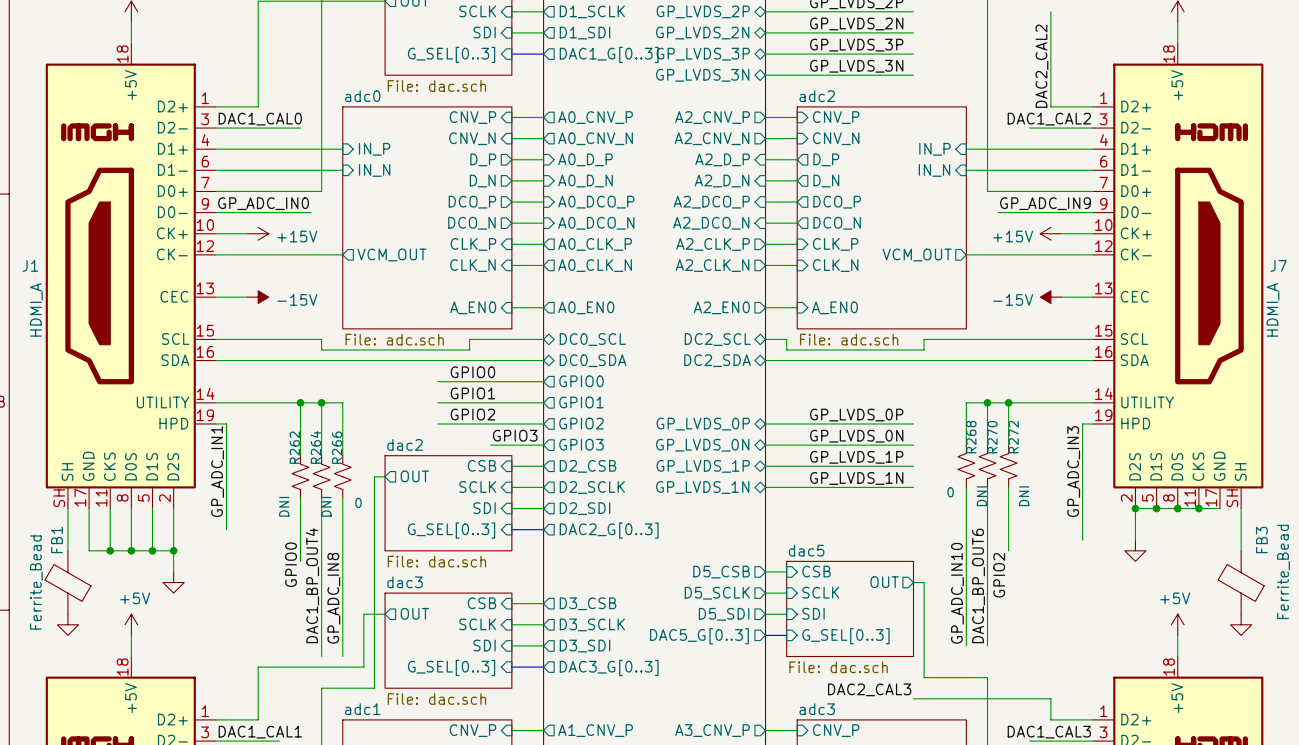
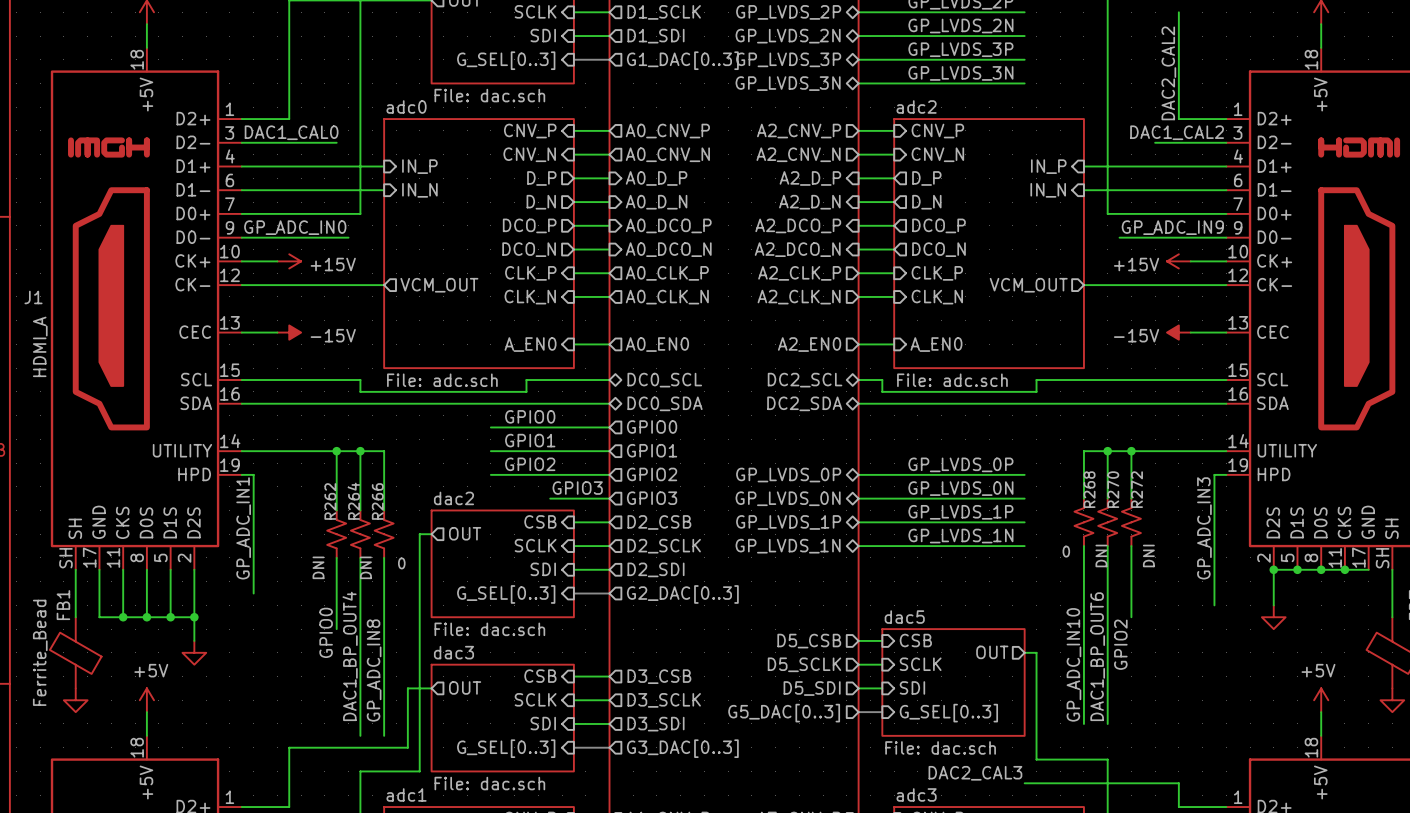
sheet pin: DAC1_G[0..3] (609, 54) -> G1_DAC[0..3] (682, 60)
sheet pin: DAC2_G[0..3] (609, 530) -> G2_DAC[0..3] (682, 594)
sheet pin: DAC5_G[0..3] (699, 636) -> G5_DAC[0..3] (784, 713)
sheet pin: DAC3_G[0..3] (609, 667) -> G3_DAC[0..3] (682, 748)

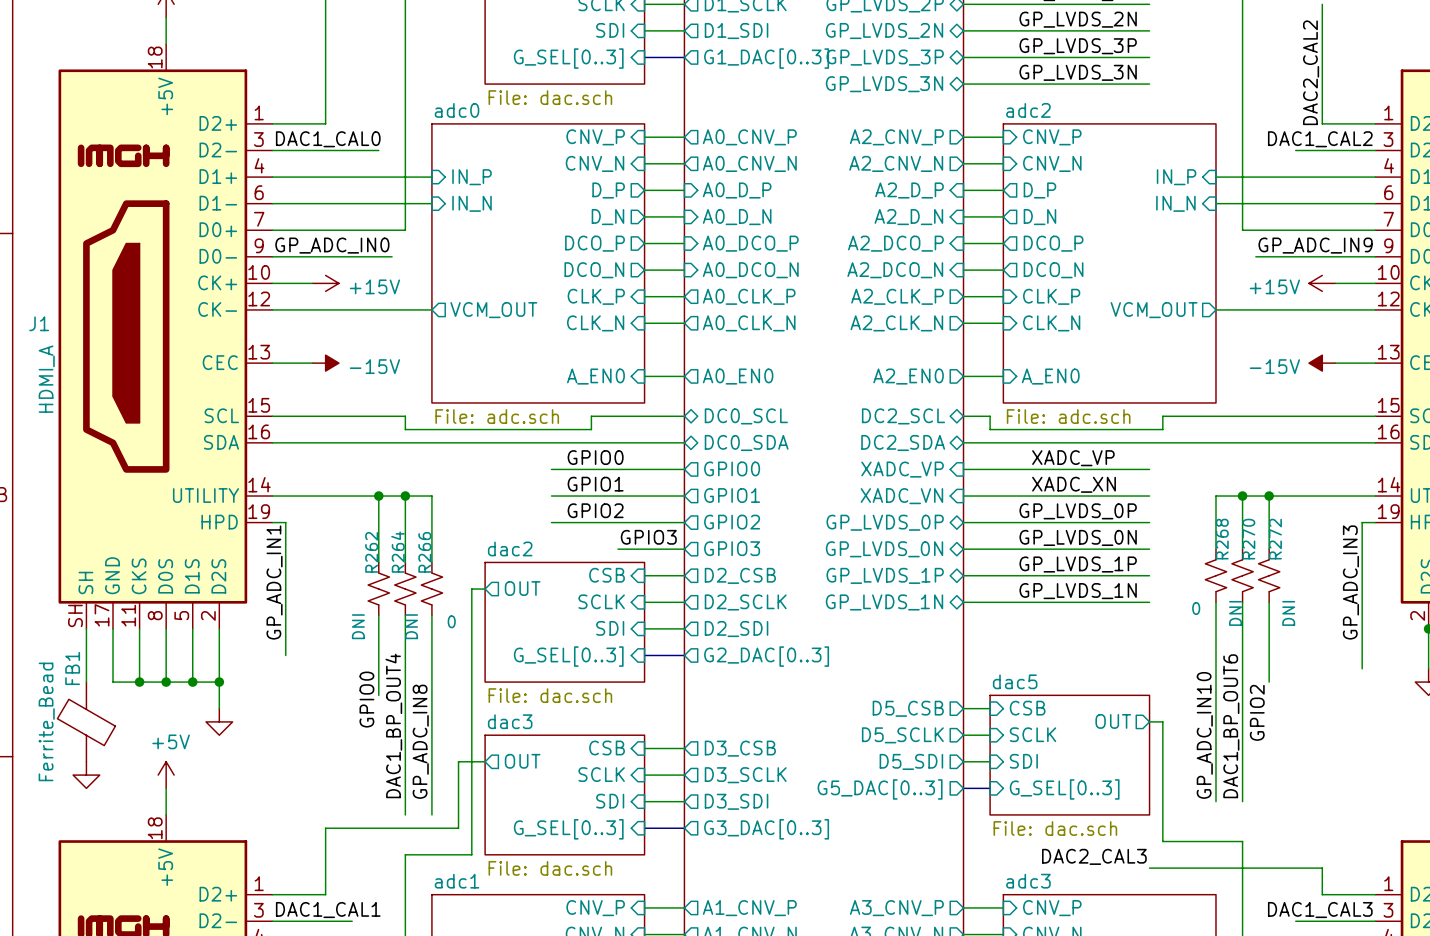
label: none -> XADC_VP (1073, 458)
sheet pin: none -> XADC_VP (902, 469)
wire: none -> (963, 469) (1149, 469)
label: none -> XADC_XN (1074, 484)
sheet pin: none -> XADC_VN (901, 496)
wire: none -> (963, 496) (1149, 496)

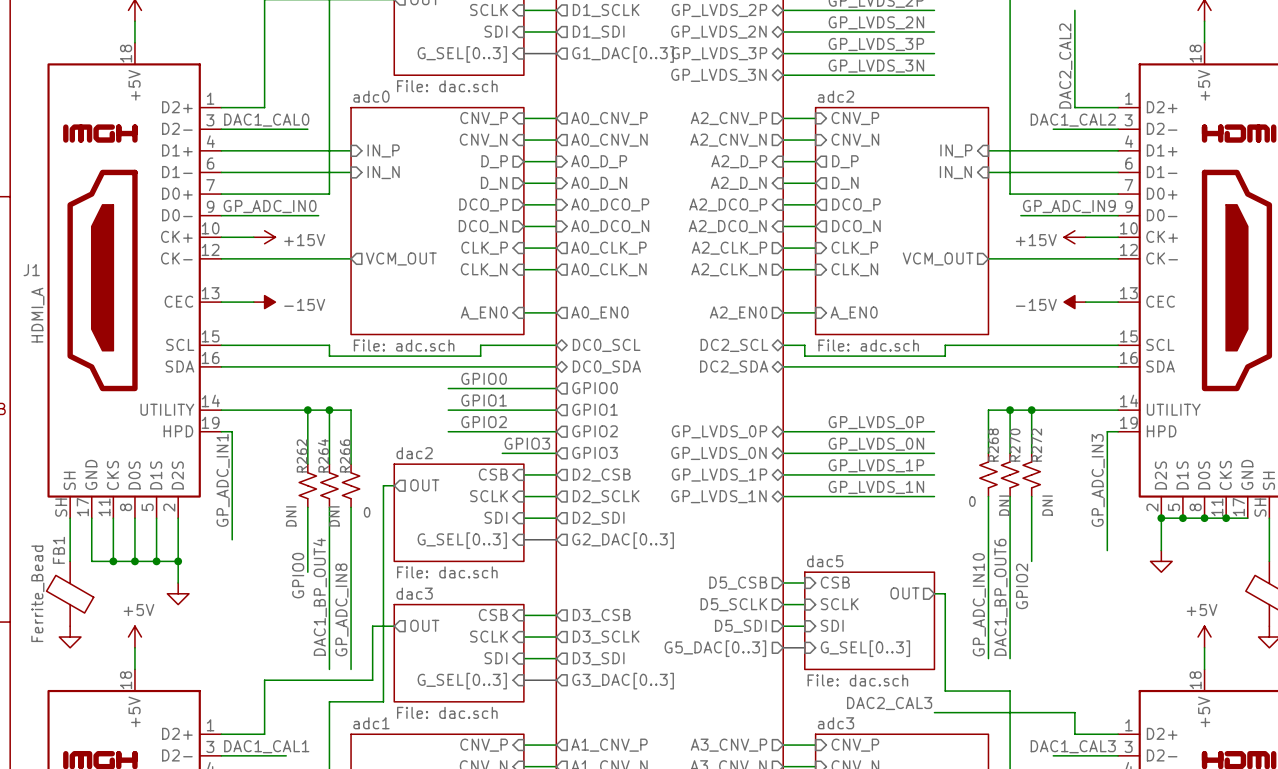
label: XADC_VP (1073, 458) -> none
sheet pin: XADC_VP (902, 469) -> none
wire: (963, 469) (1149, 469) -> none
label: XADC_XN (1074, 484) -> none
sheet pin: XADC_VN (901, 496) -> none
wire: (963, 496) (1149, 496) -> none

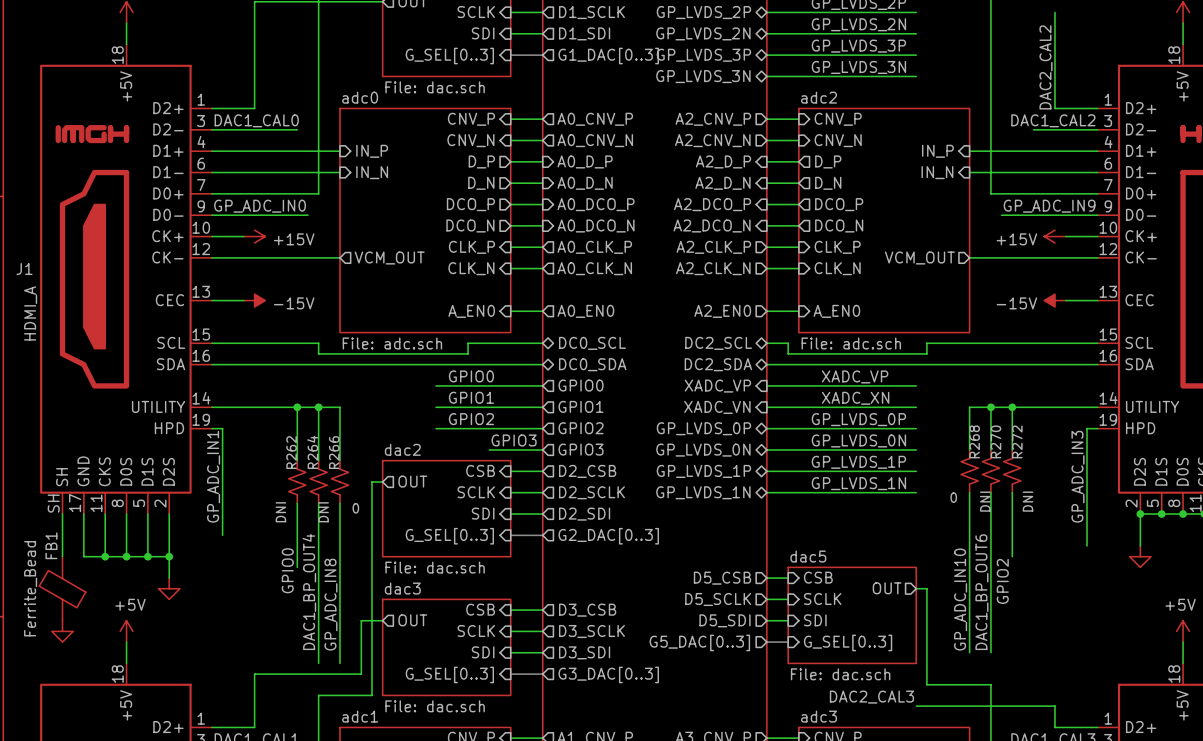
label: none -> XADC_VP (855, 376)
sheet pin: none -> XADC_VP (717, 386)
wire: none -> (766, 385) (916, 385)
label: none -> XADC_XN (855, 398)
sheet pin: none -> XADC_VN (717, 407)
wire: none -> (766, 407) (916, 407)

